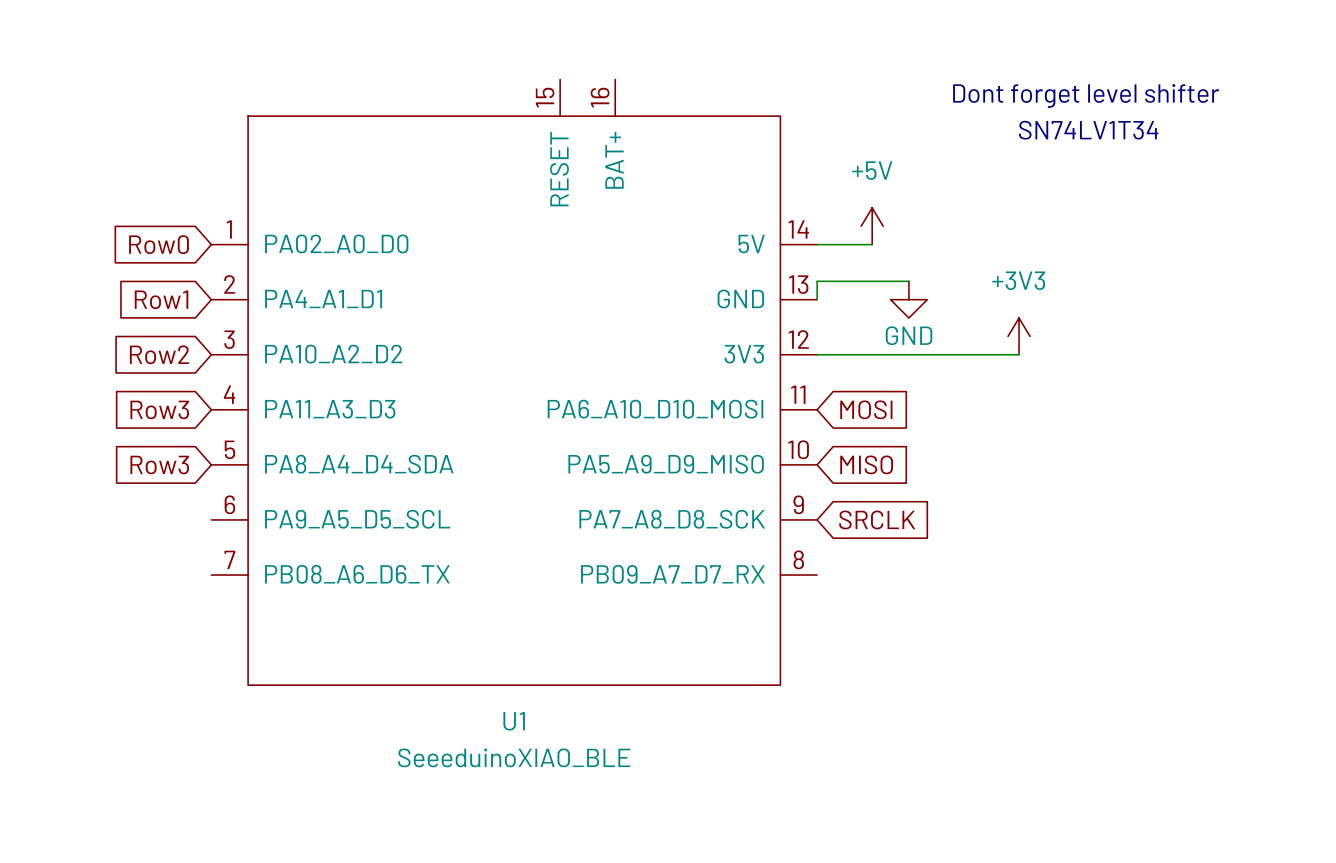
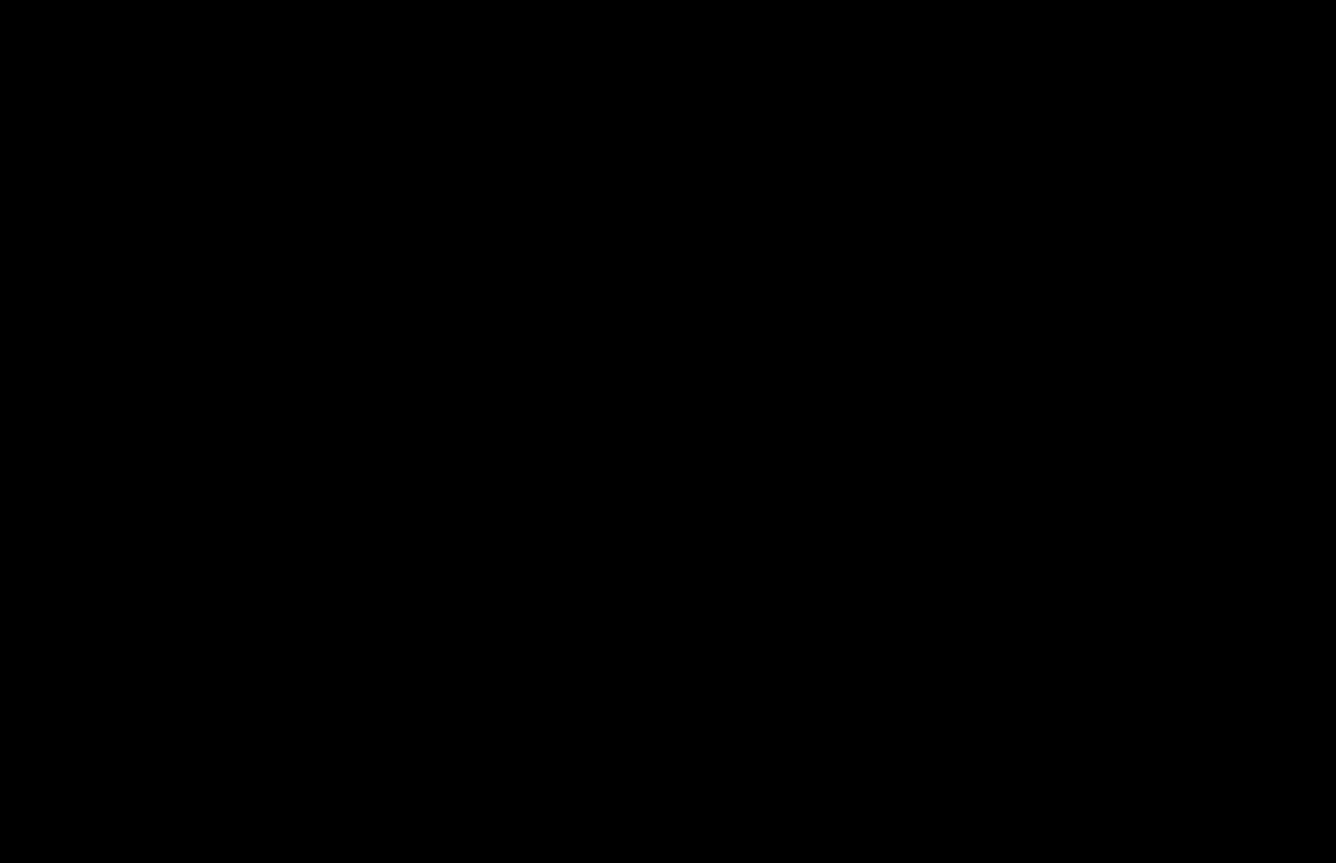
text: Dont forget level shifter (1086, 95) -> none
text: SN74LV1T34 (1088, 130) -> none
power symbol: +5V (872, 226) -> none
global label: Row0 (159, 244) -> none
wire: (817, 244) (872, 244) -> none
wire: (908, 281) (817, 281) (817, 299) -> none
global label: Row1 (161, 299) -> none
power symbol: GND (908, 299) -> none
power symbol: +3V3 (1019, 336) -> none
global label: Row2 (159, 354) -> none
wire: (817, 354) (1019, 354) -> none
U1: SeeeduinoXIAO_BLE (514, 382) -> none
global label: Row3 (159, 409) -> none
global label: MOSI (866, 409) -> none
global label: Row3 (159, 464) -> none
global label: MISO (866, 464) -> none
global label: SRCLK (877, 519) -> none

